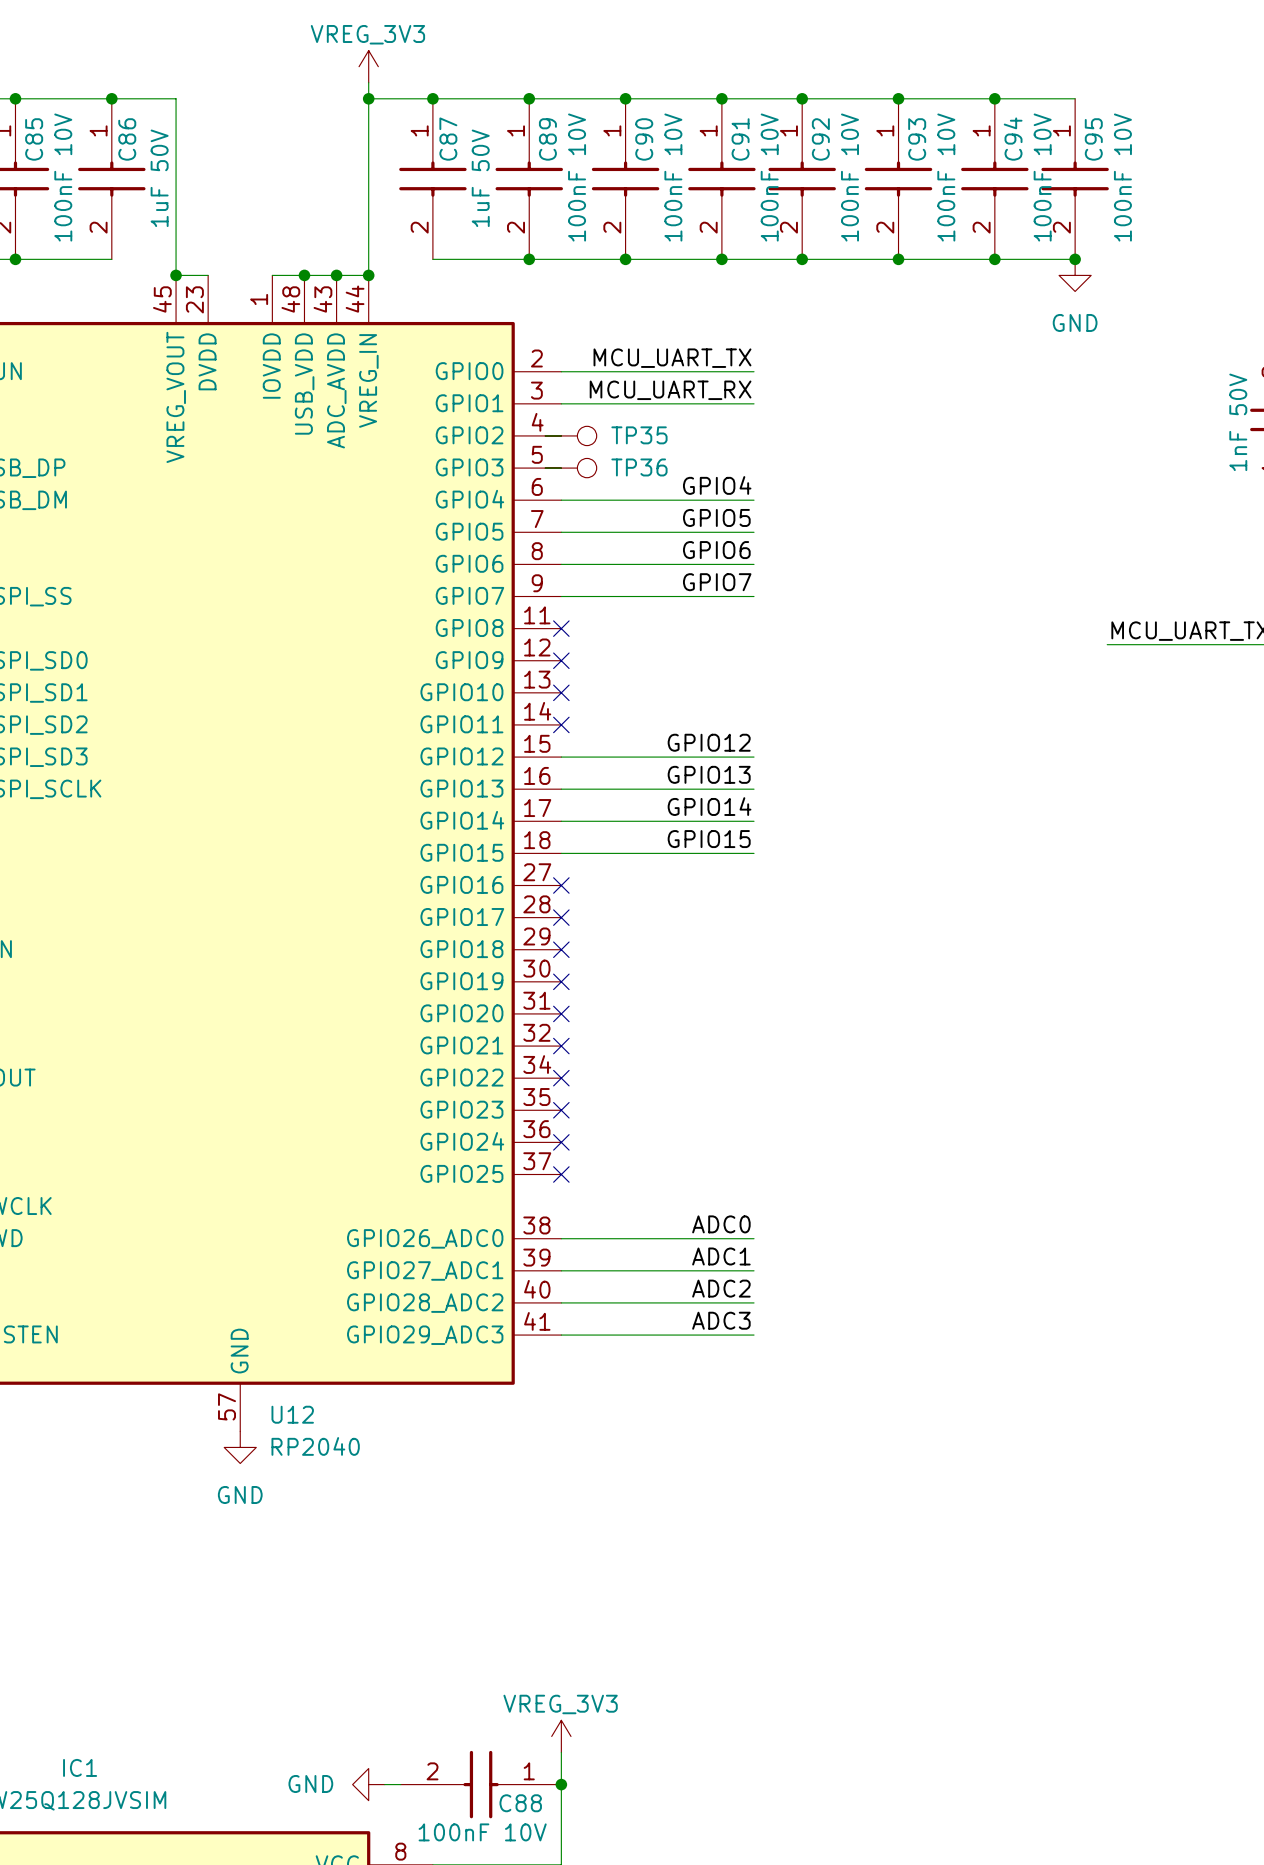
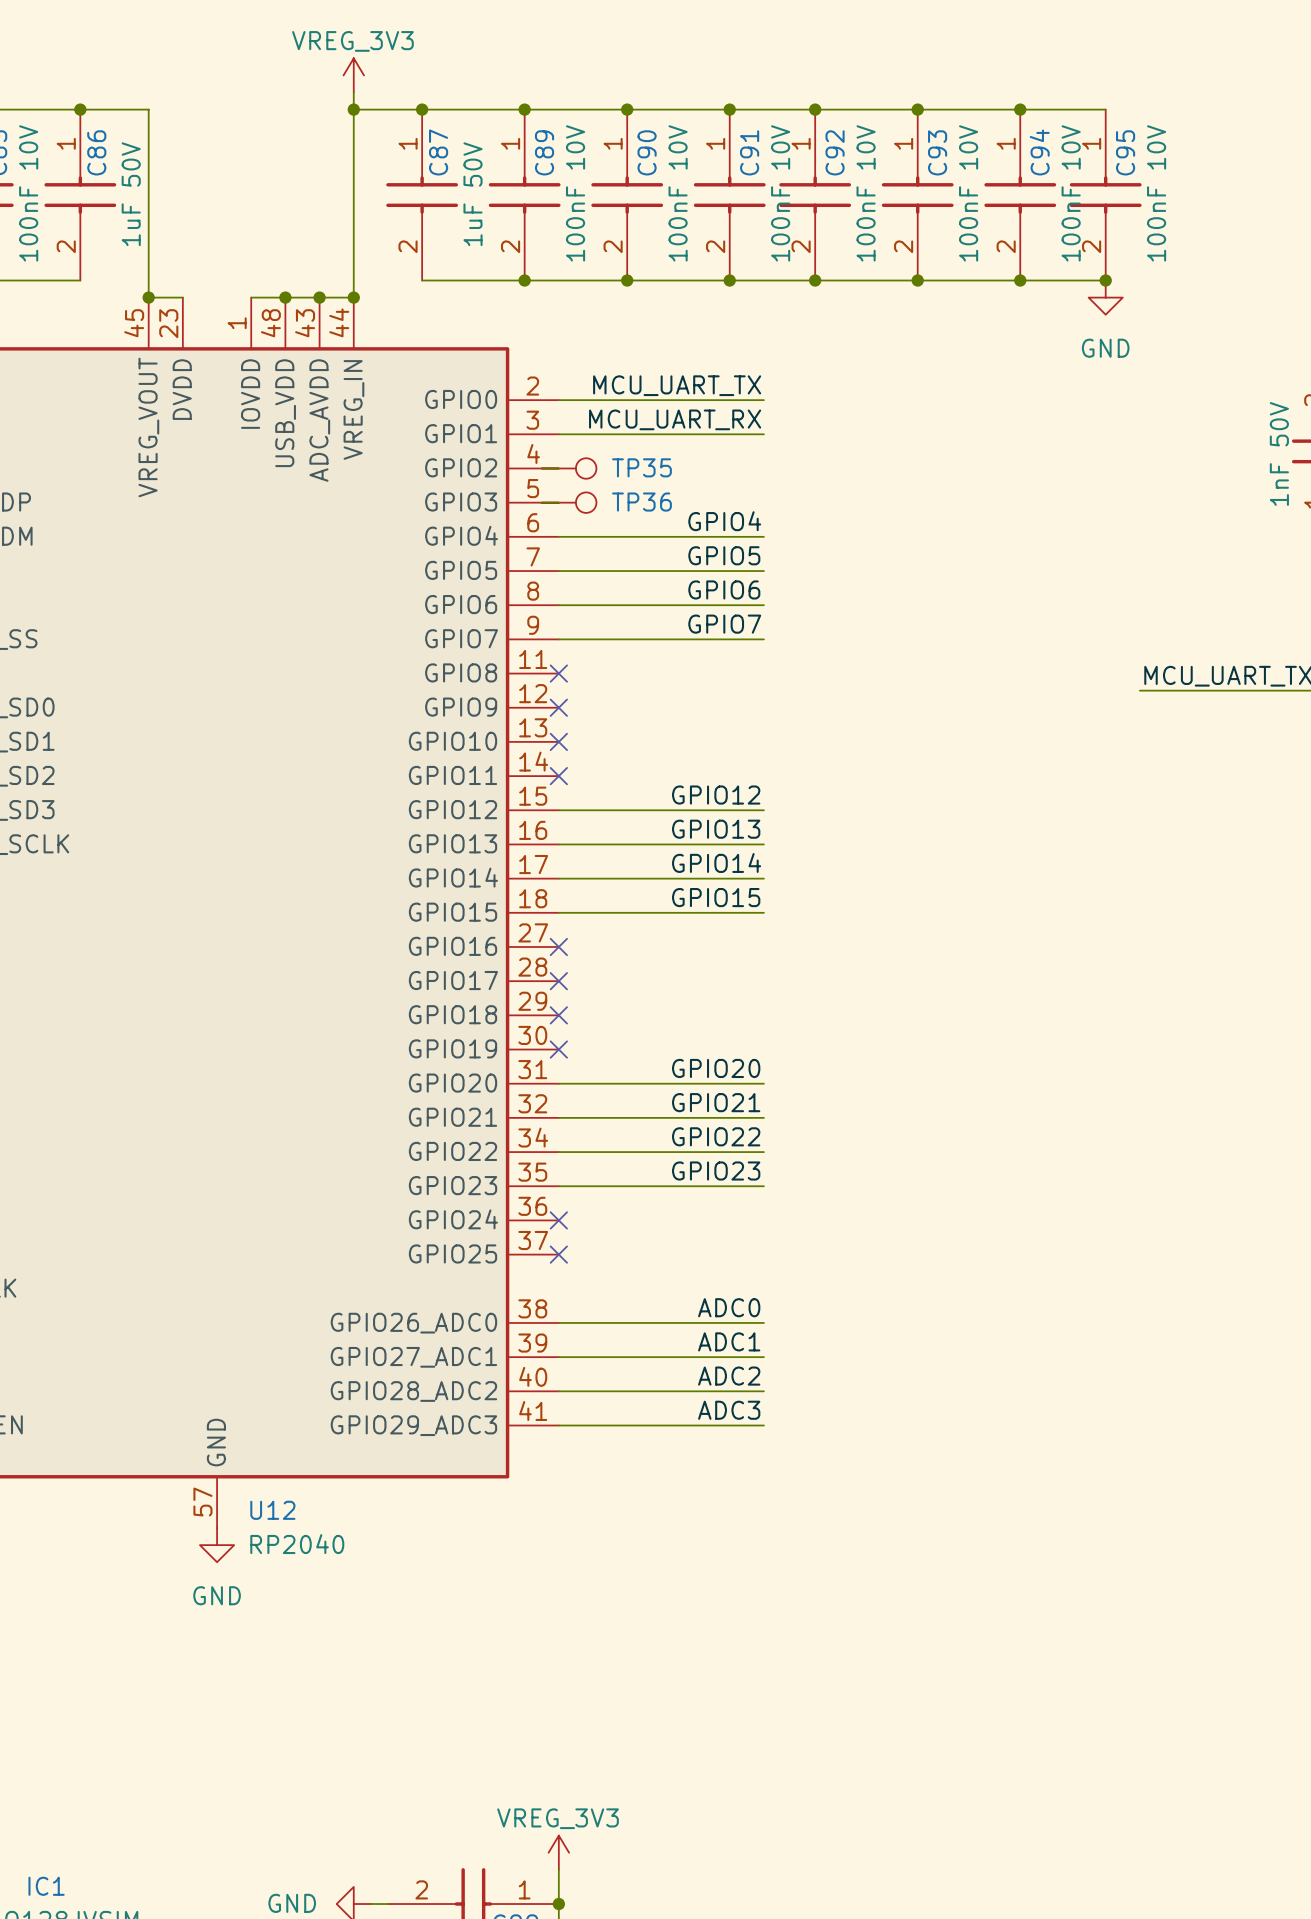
label: none -> GPIO20 (716, 1068)
wire: none -> (558, 1083) (763, 1083)
no-connect mark: (561, 1013) -> none
label: none -> GPIO21 (716, 1102)
wire: none -> (558, 1117) (763, 1117)
no-connect mark: (561, 1046) -> none
label: none -> GPIO22 (716, 1136)
wire: none -> (558, 1152) (763, 1152)
no-connect mark: (561, 1078) -> none
label: none -> GPIO23 (716, 1171)
wire: none -> (558, 1186) (763, 1186)
no-connect mark: (561, 1110) -> none

